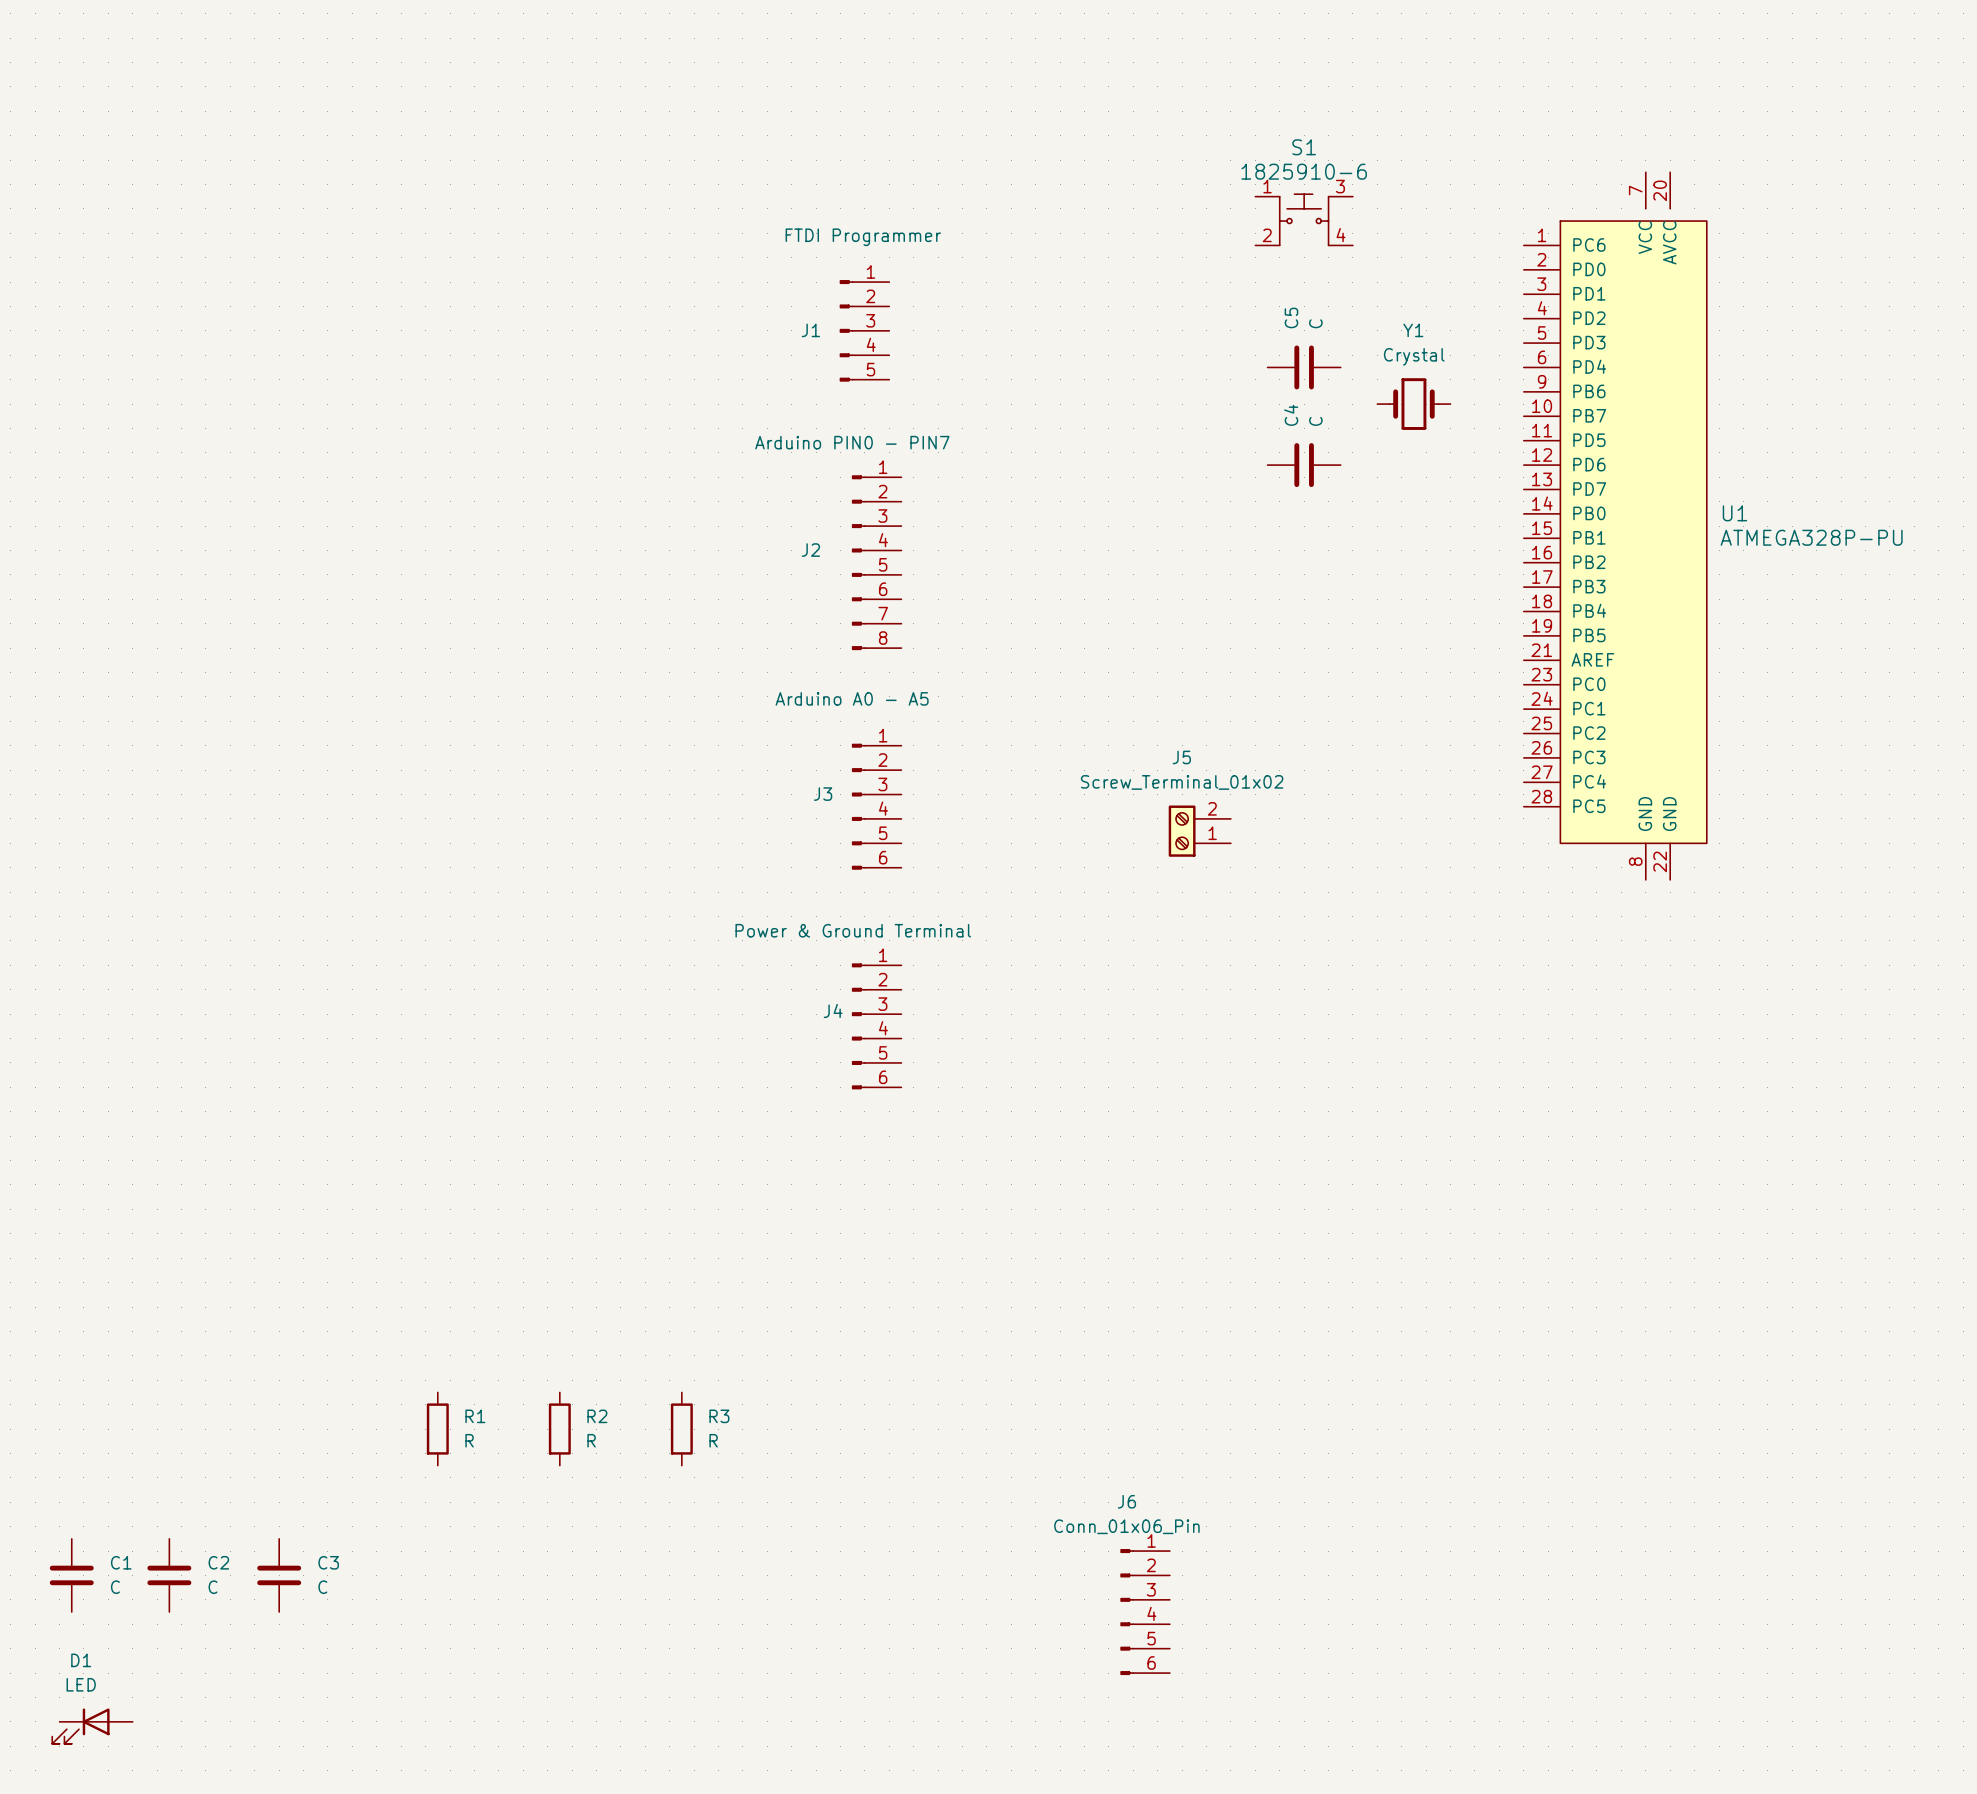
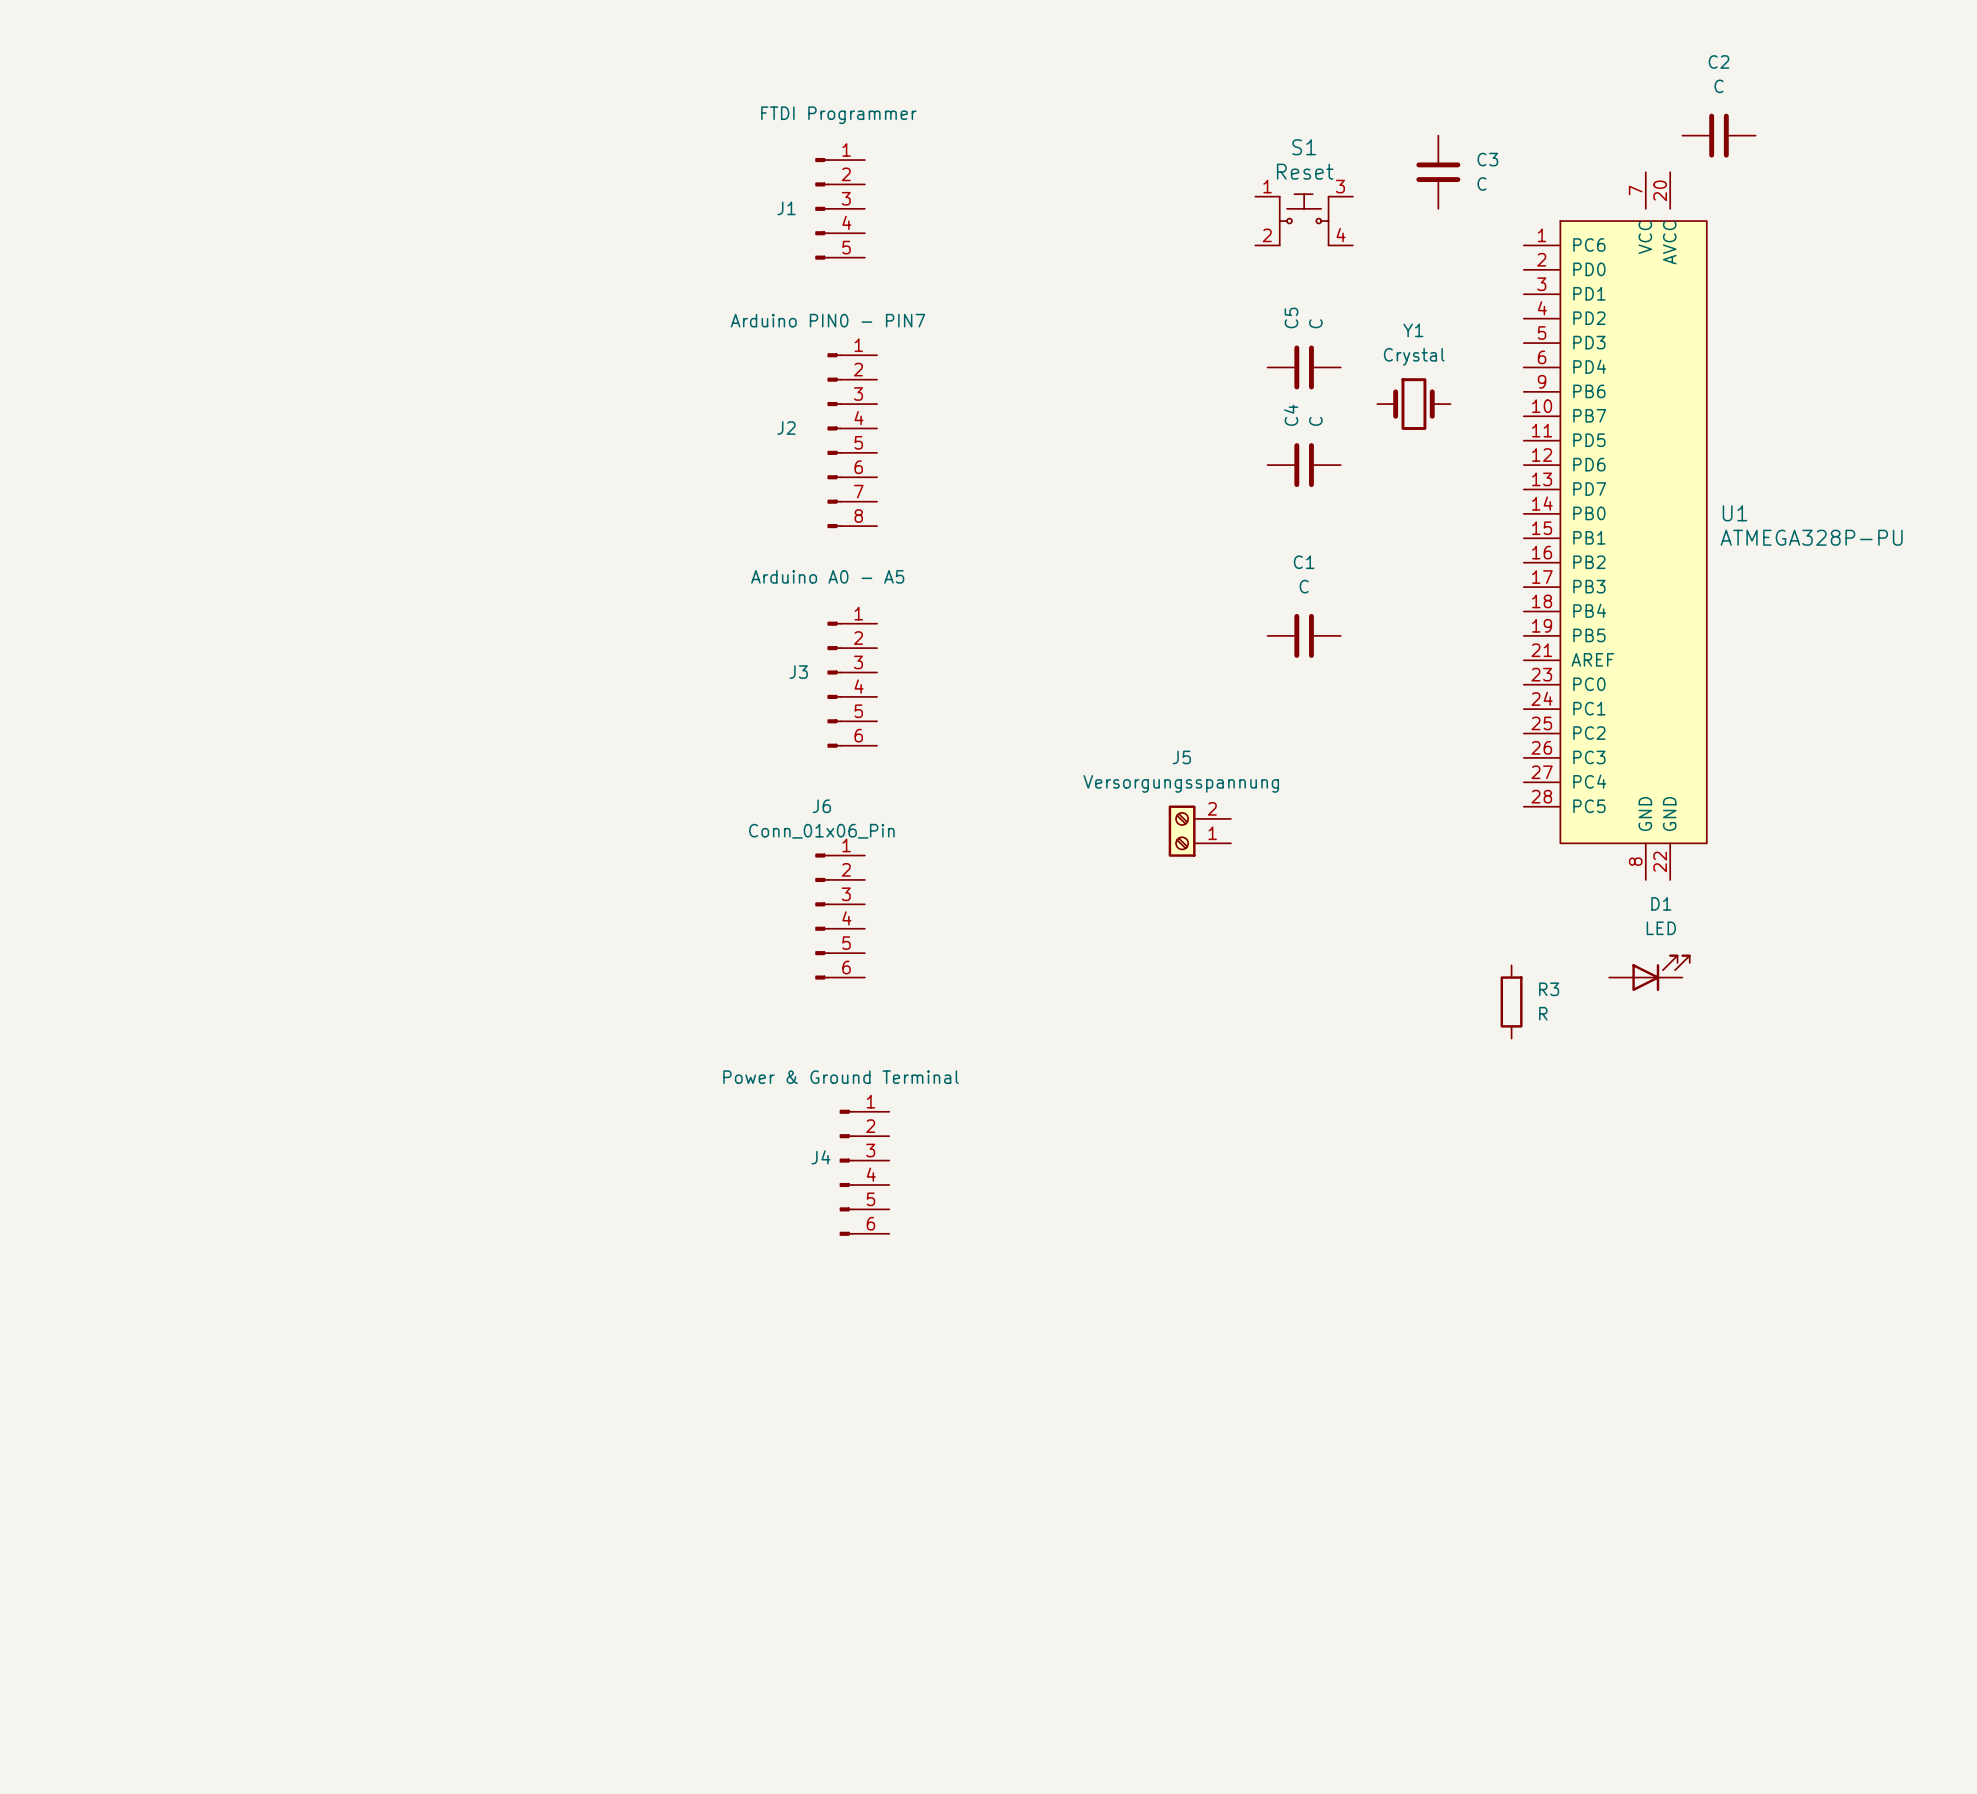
S1 value: 1825910-6 (1304, 171) -> Reset (1305, 171)
J1 position: (864, 330) -> (840, 208)
J2 position: (876, 562) -> (852, 440)
J5 value: Screw_Terminal_01x02 (1182, 782) -> Versorgungsspannung (1181, 783)
J3 position: (876, 806) -> (852, 684)
J4 position: (876, 1026) -> (864, 1172)
R1: R (437, 1429) -> none
R2: R (559, 1429) -> none
R3 position: (681, 1429) -> (1511, 1001)
C1 name position: C1 (121, 1562) -> C1 (1304, 562)
C2 name position: C2 (218, 1562) -> C2 (1719, 61)
C1 rotation: 0° (71, 1575) -> 90° clockwise (1304, 635)
C1 position: (71, 1575) -> (1304, 635)
C2 rotation: 0° (169, 1575) -> 90° clockwise (1719, 135)
C2 position: (169, 1575) -> (1719, 135)
C3 position: (279, 1575) -> (1438, 172)
C1 value position: C (115, 1587) -> C (1304, 586)
C2 value position: C (213, 1587) -> C (1719, 86)
J6 position: (1145, 1612) -> (840, 916)
D1 name position: D1 (81, 1660) -> D1 (1661, 903)
D1 value position: LED (81, 1684) -> LED (1661, 928)
D1 rotation: 0° (80, 1726) -> 180° (1661, 973)
D1 position: (92, 1726) -> (1649, 973)

